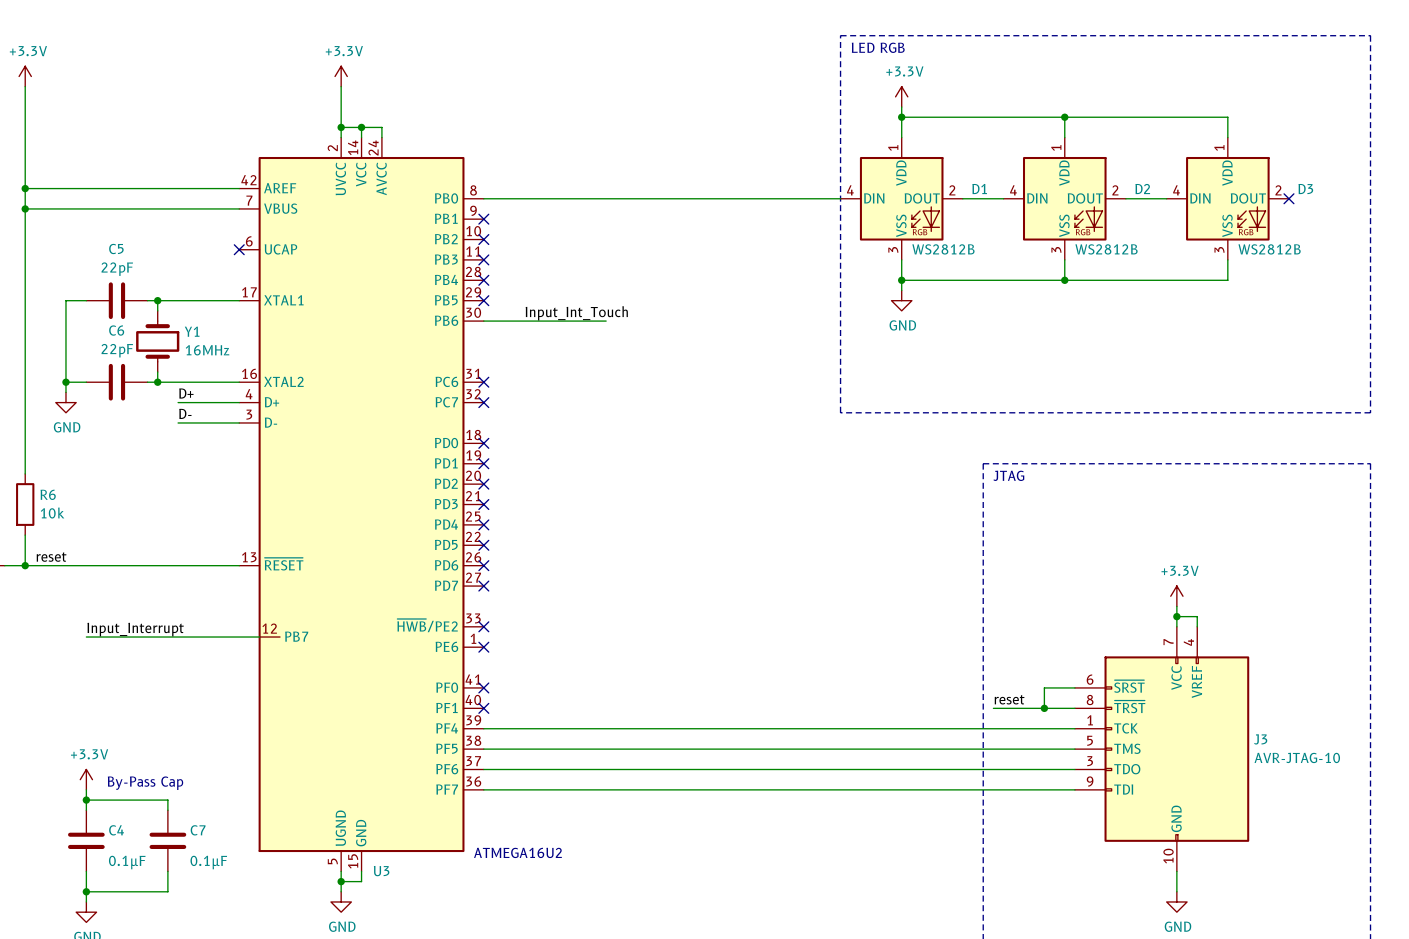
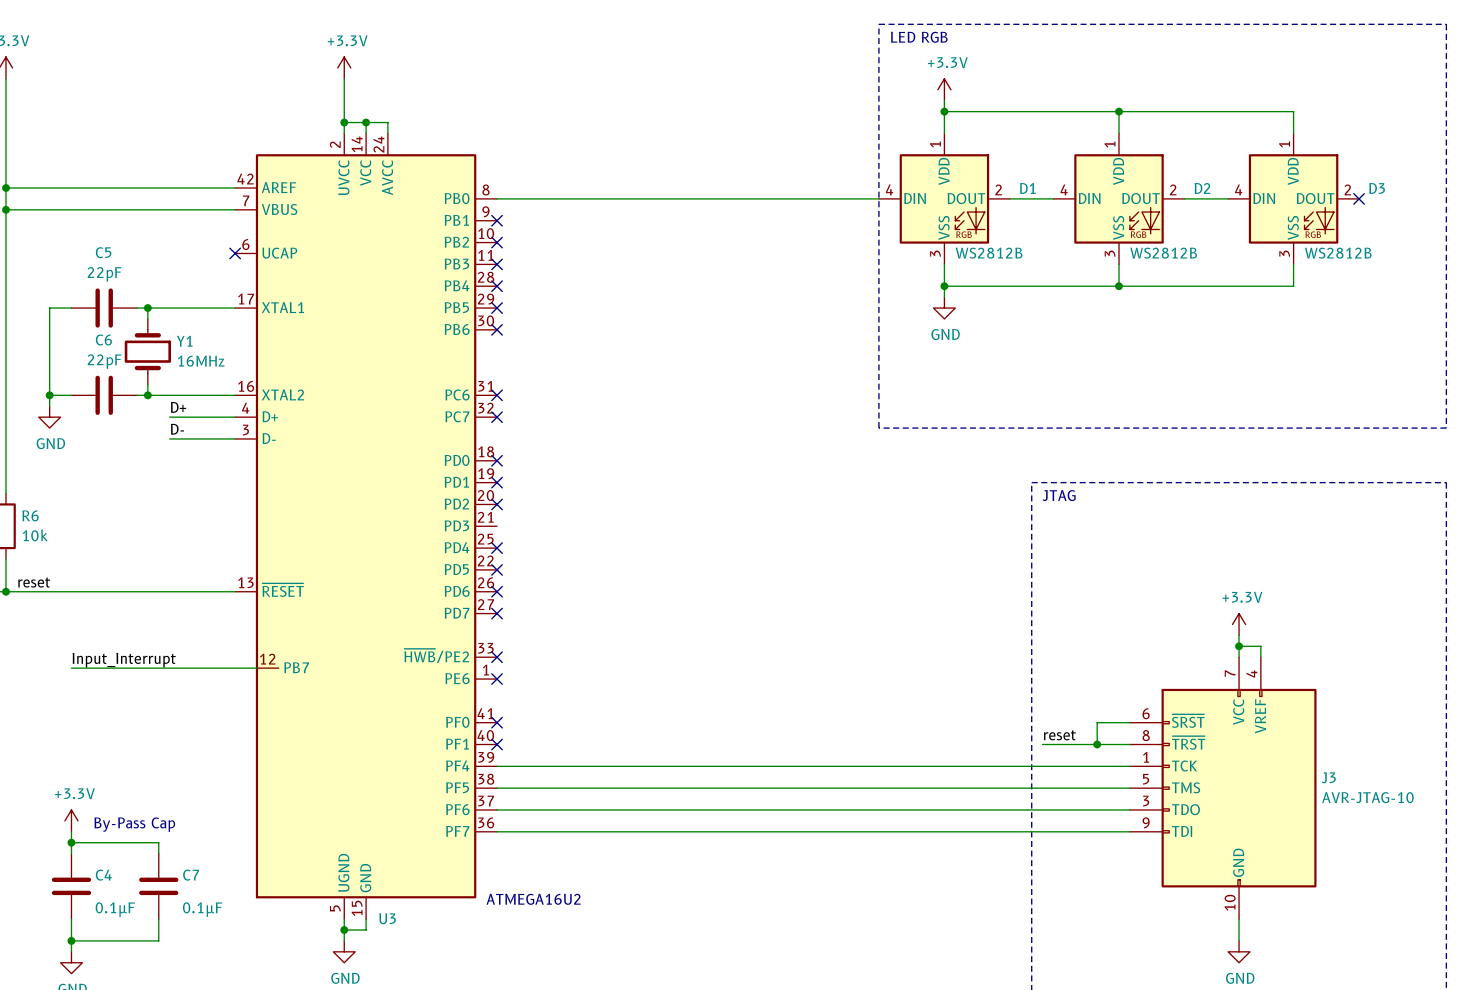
label: Input_Int_Touch (576, 313) -> none
wire: (483, 321) (606, 321) -> none
no-connect mark: none -> (497, 329)
no-connect mark: (483, 504) -> none

